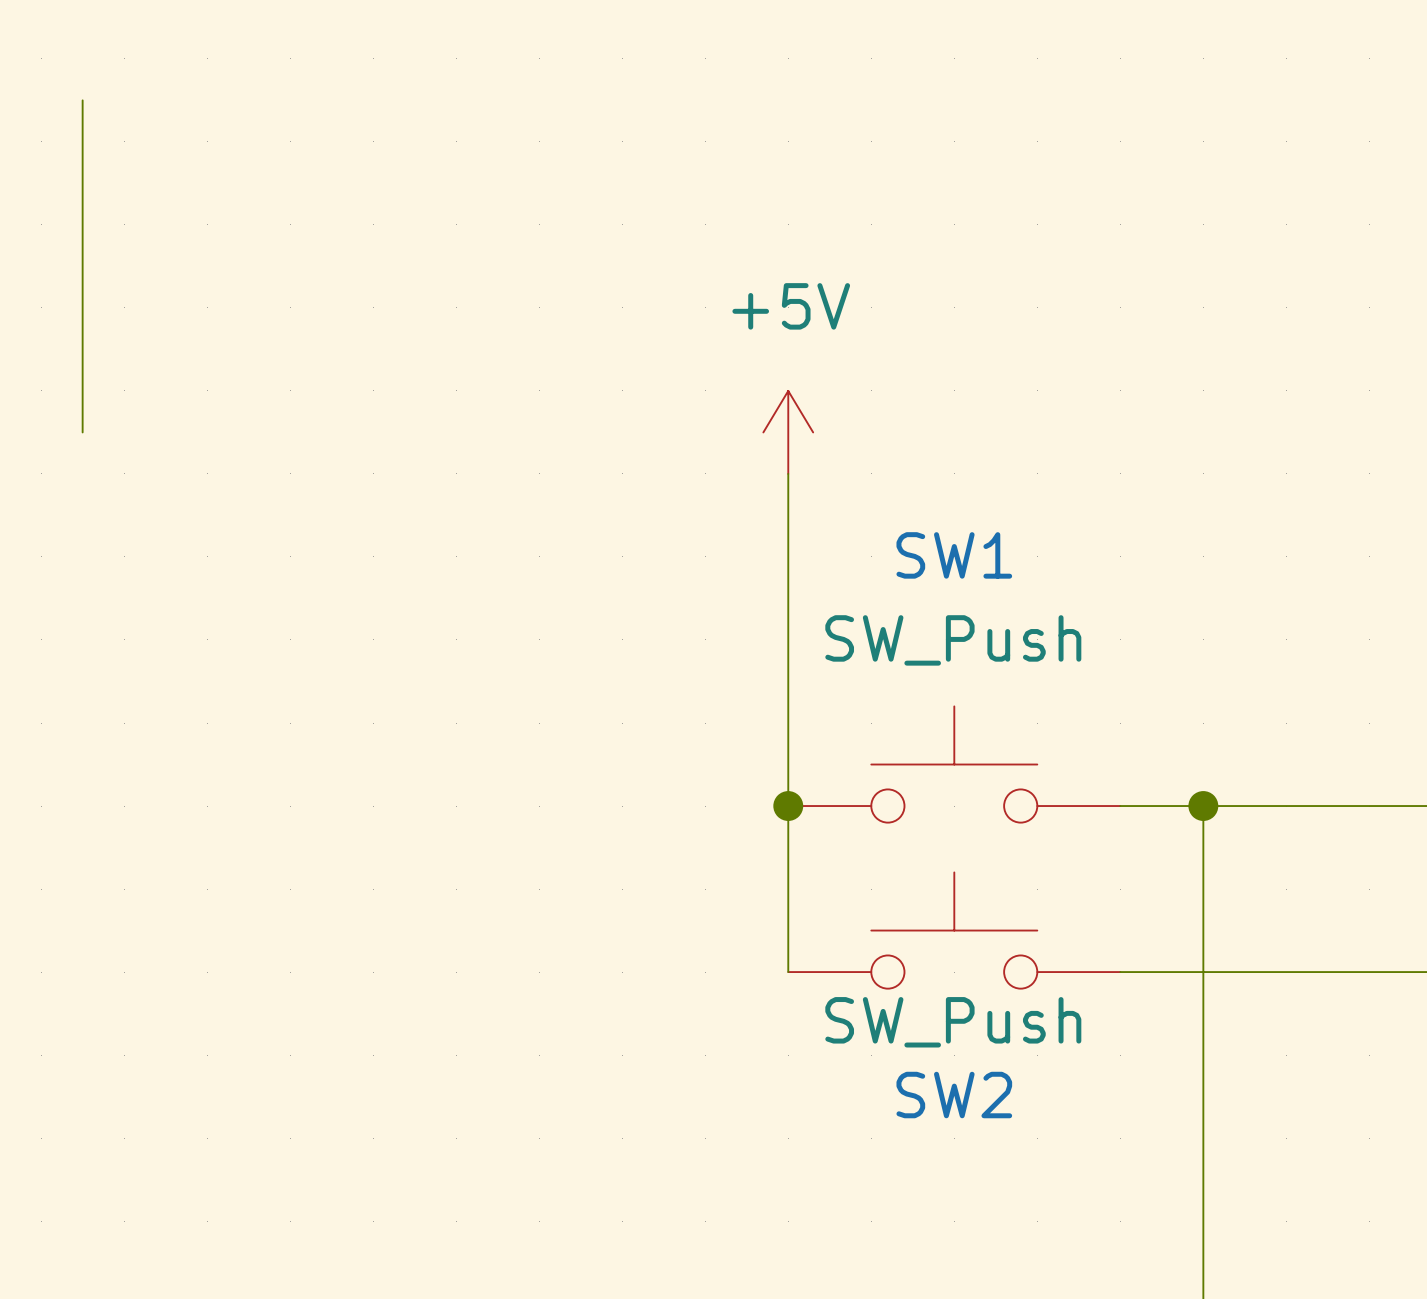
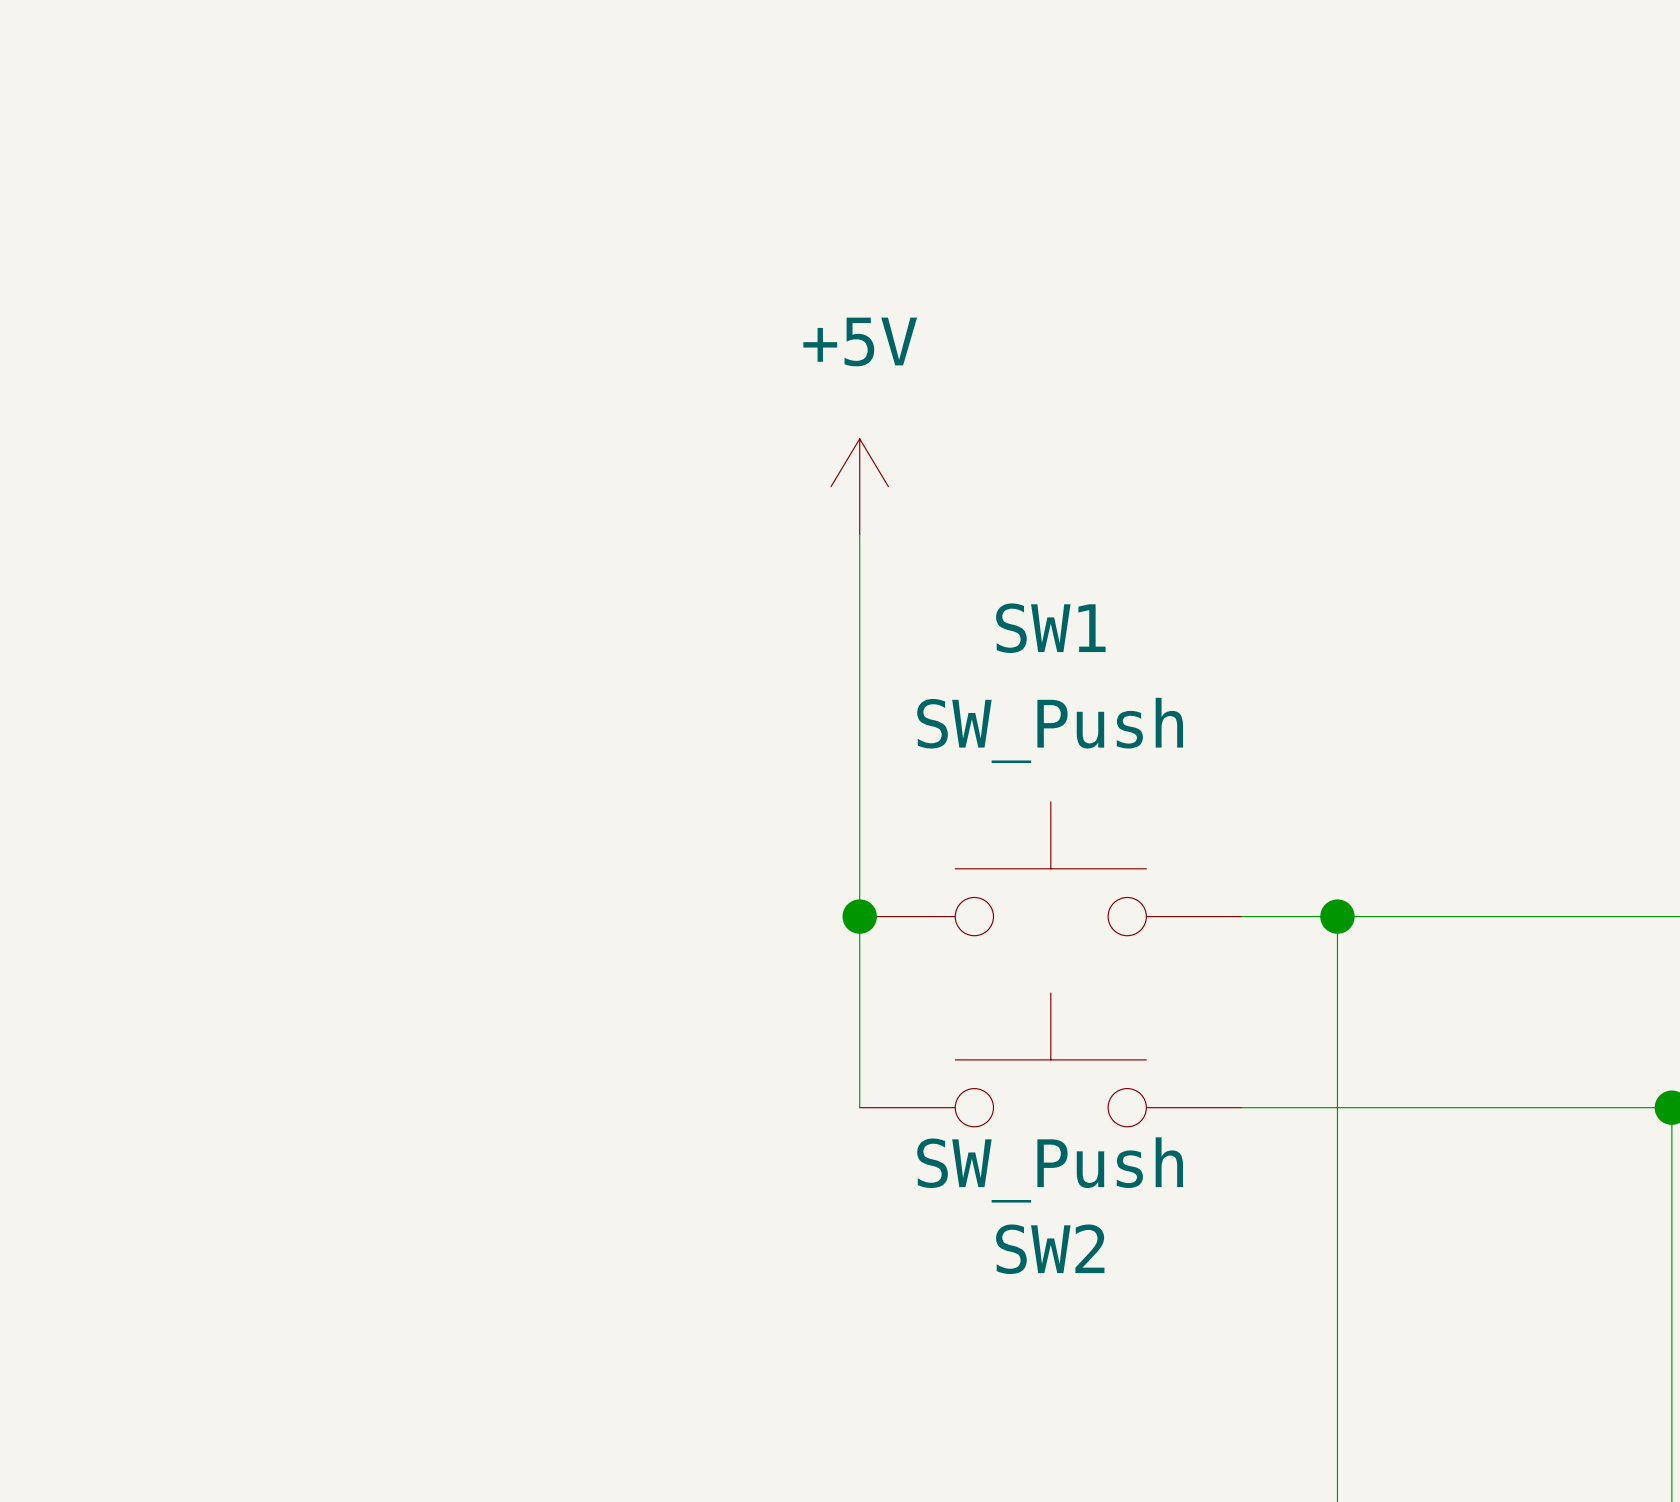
wire: (82, 100) (82, 432) -> none

